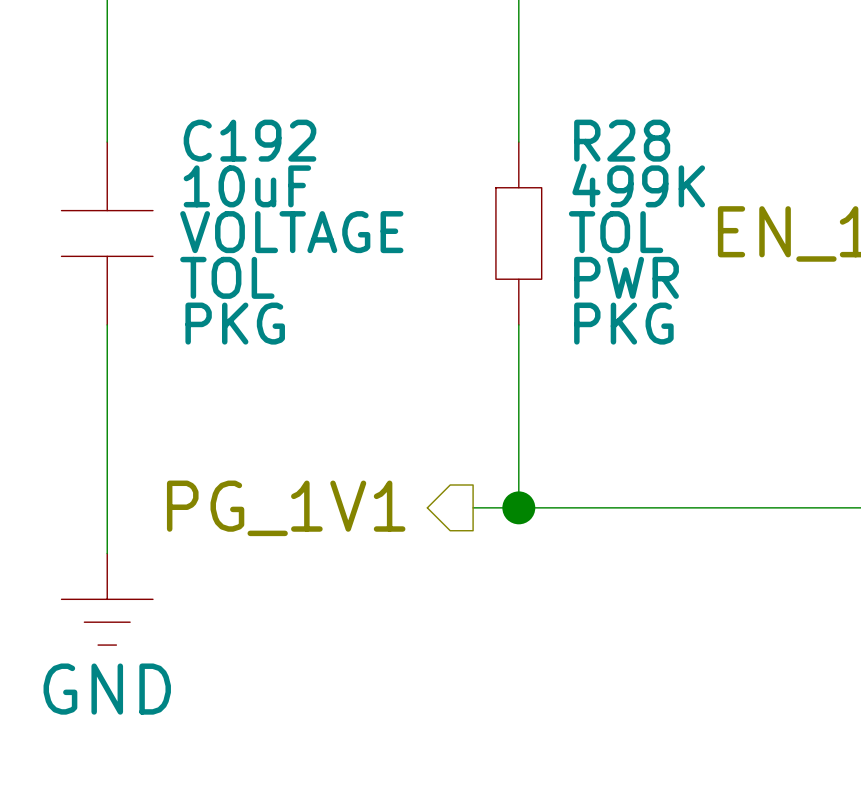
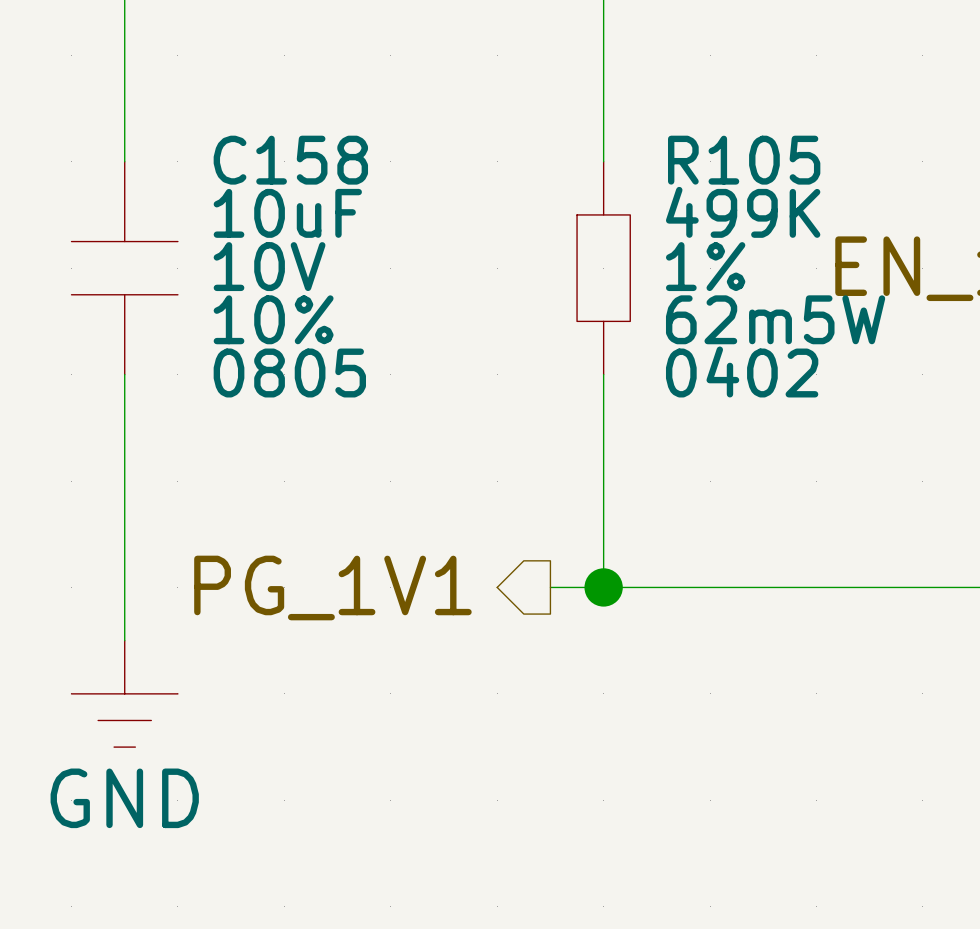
C192 name: C192 (250, 140) -> C158 (290, 160)
R28 name: R28 (622, 140) -> R105 (744, 160)
C192 text: VOLTAGE (291, 232) -> 10V (269, 266)
R28 text: TOL (616, 232) -> 1% (705, 266)
C192 text: TOL (227, 277) -> 10% (273, 319)
R28 text: PWR (626, 277) -> 62m5W (775, 319)
C192 text: PKG (235, 323) -> 0805 (289, 373)
R28 text: PKG (623, 323) -> 0402 (742, 371)

